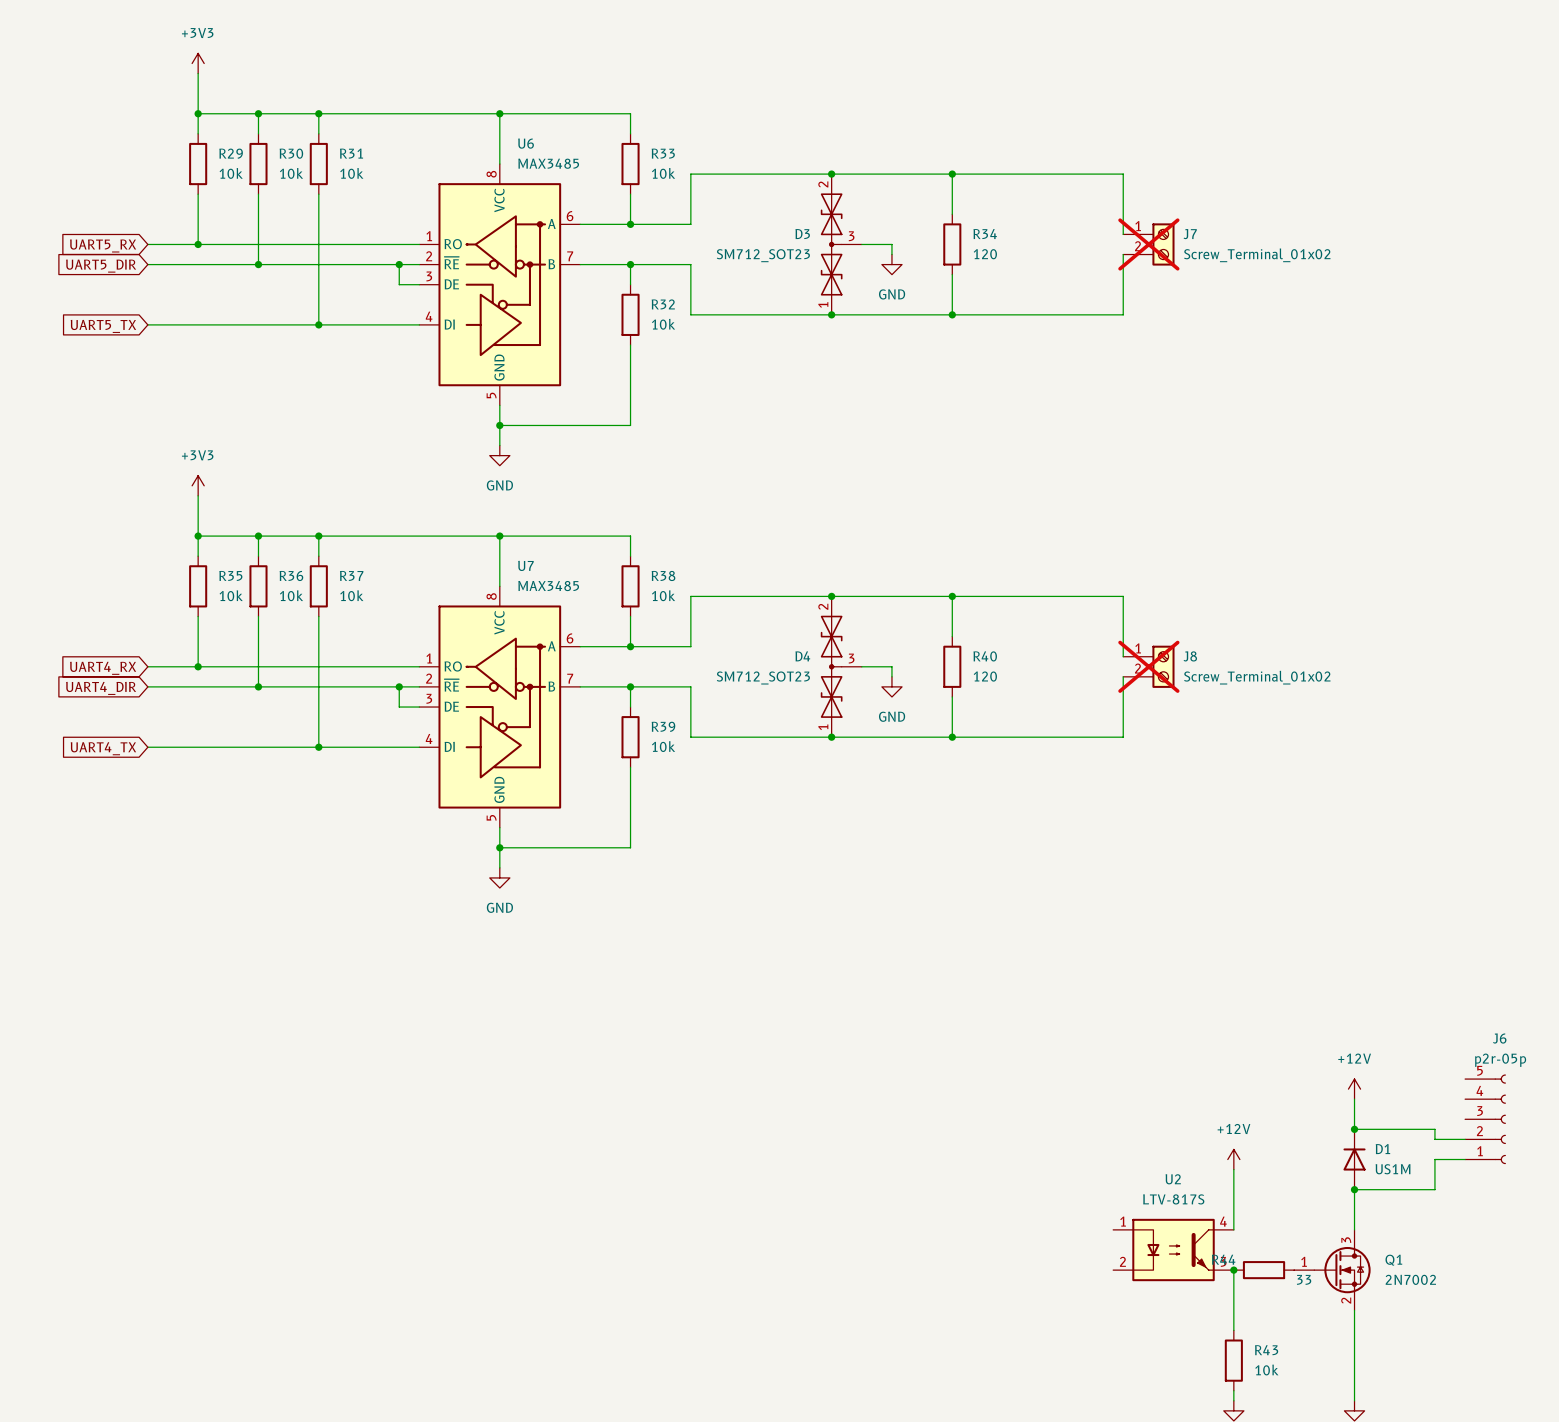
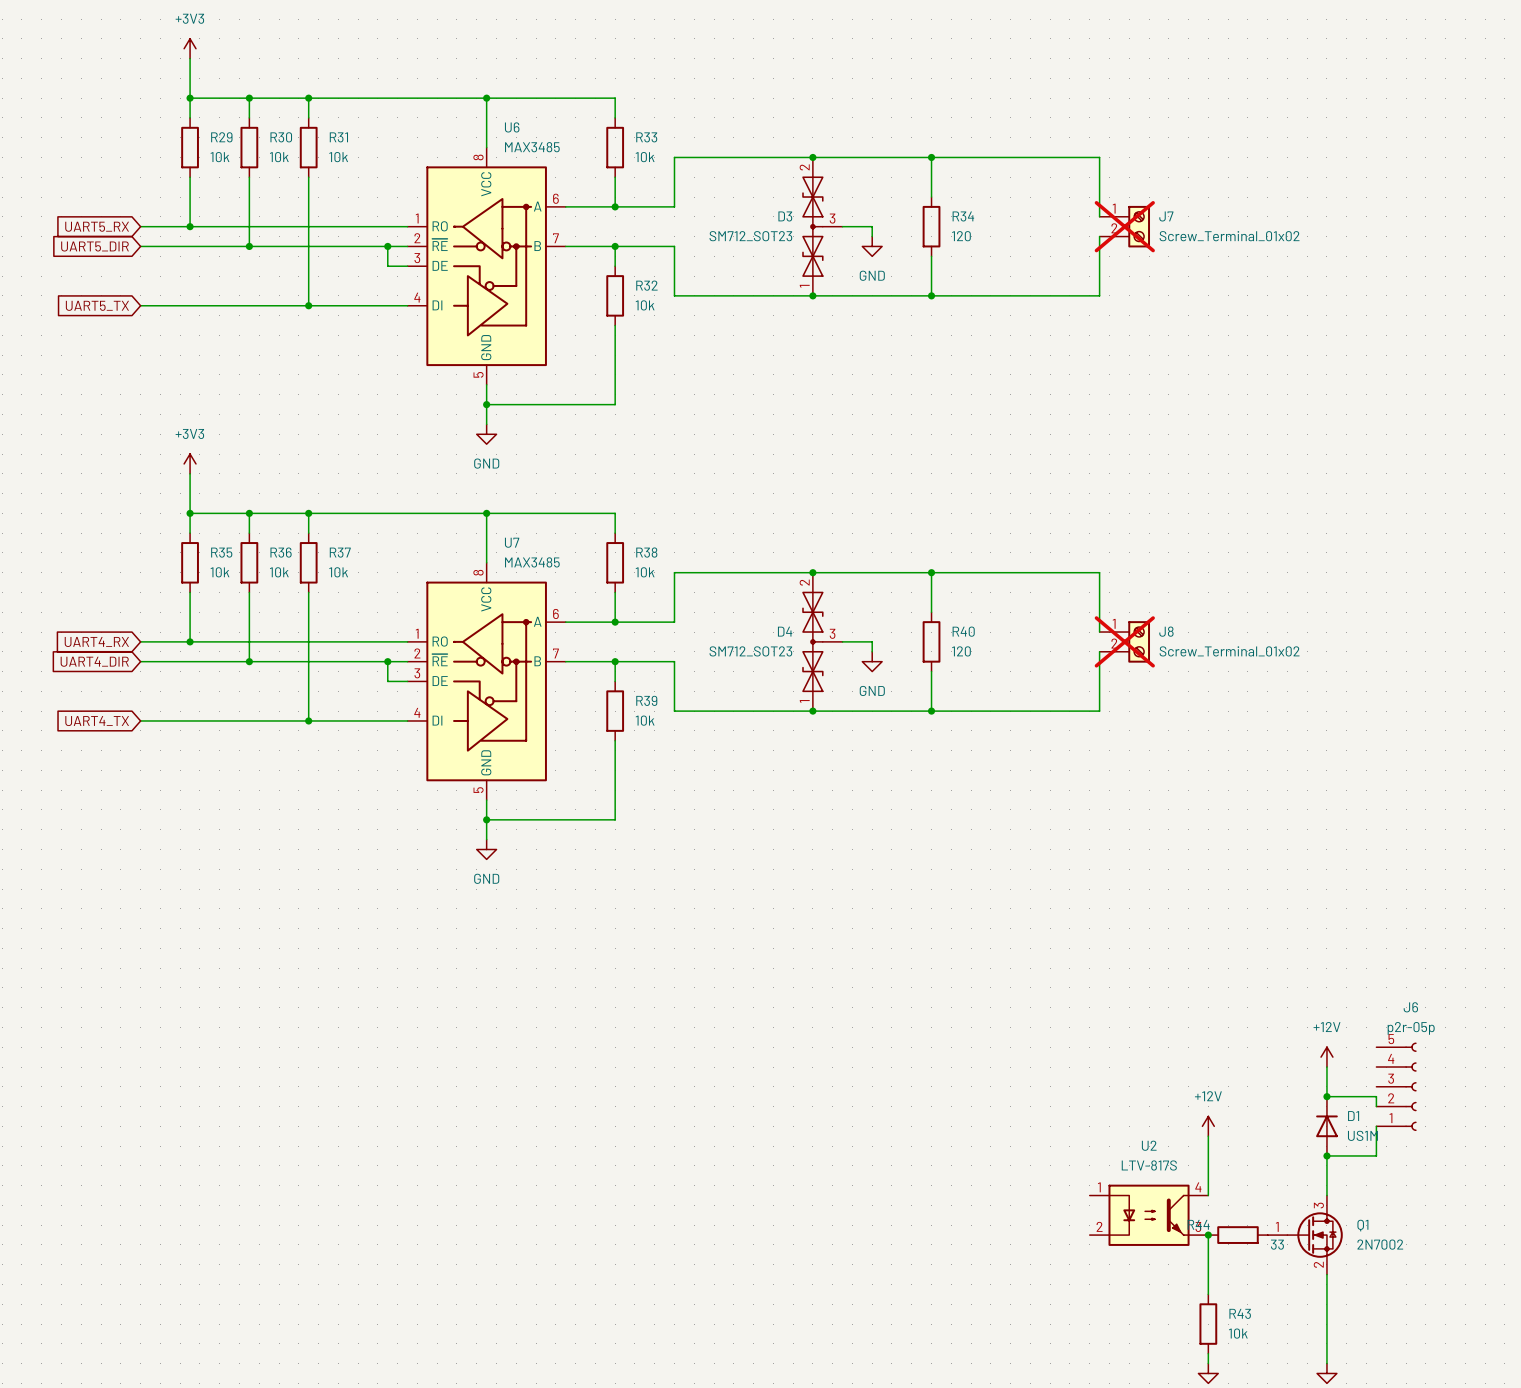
J6 position: (1485, 1119) -> (1396, 1086)
wire: (1404, 1129) (1434, 1129) (1434, 1139) (1465, 1139) -> (1376, 1096) (1376, 1106)
wire: (1465, 1159) (1434, 1159) (1434, 1189) (1404, 1189) -> (1376, 1126) (1376, 1155)

